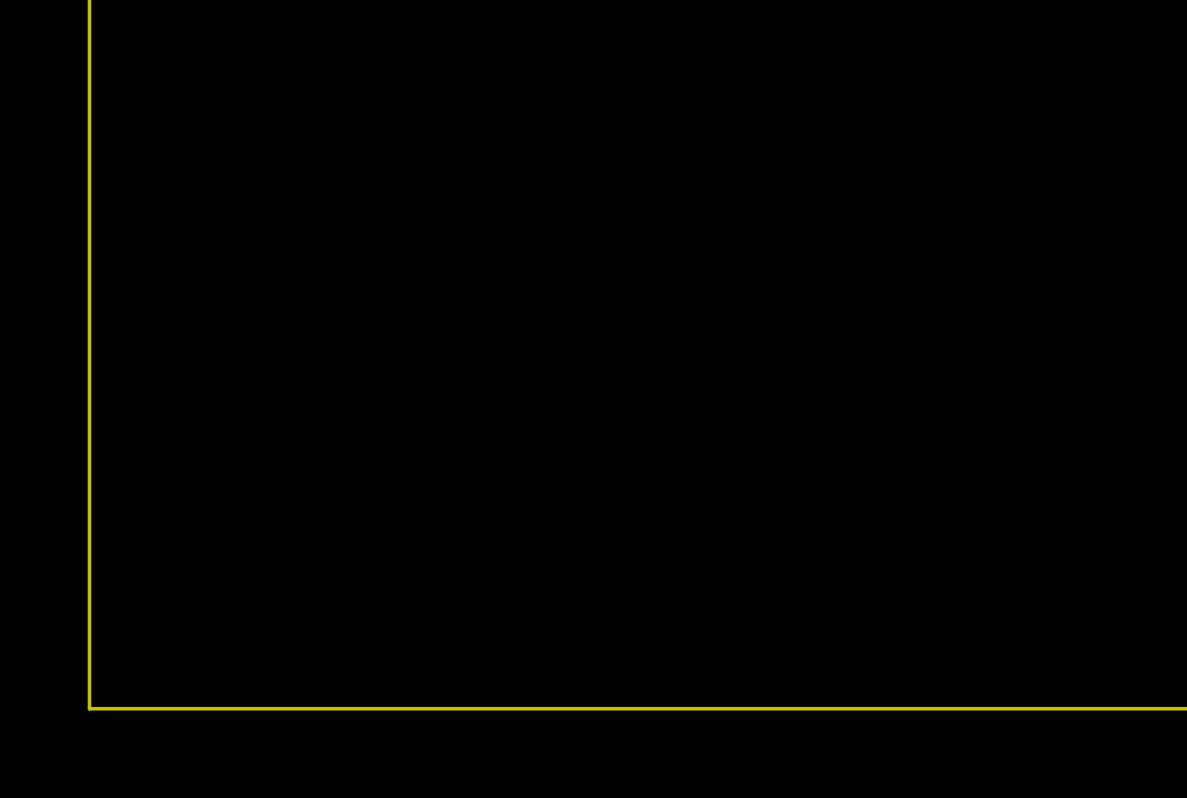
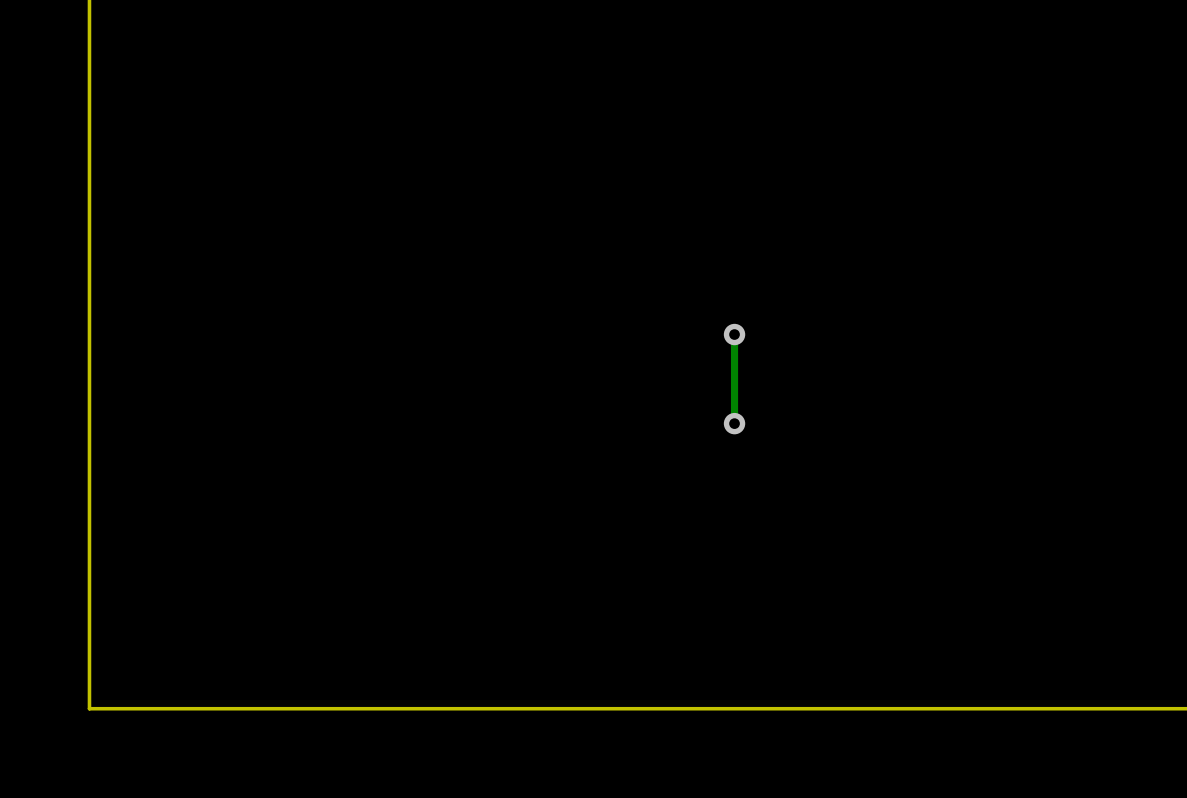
track: none -> (734, 334) (734, 423)
via: none -> (734, 334)
via: none -> (734, 423)

